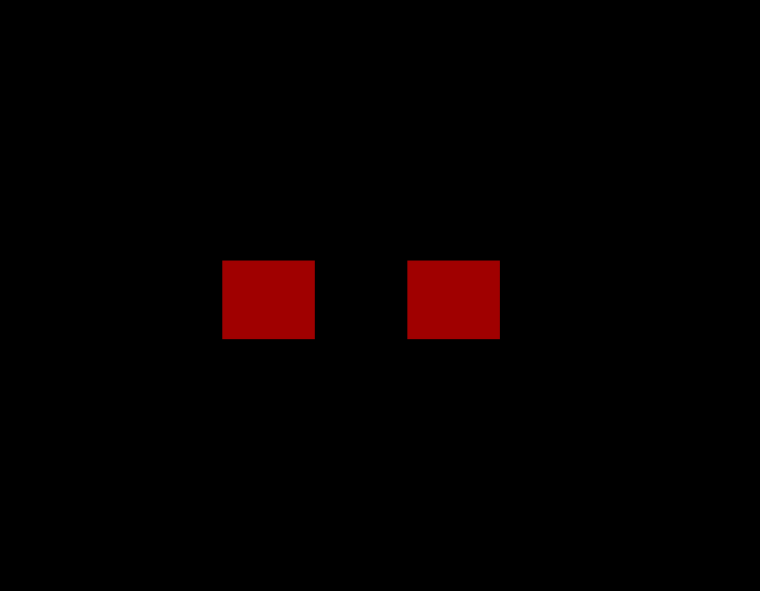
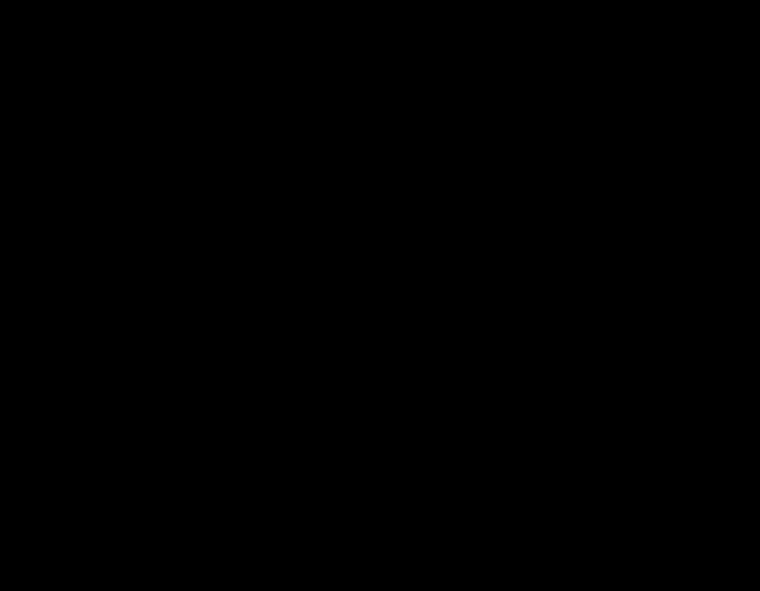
part: (361, 299) -> none

